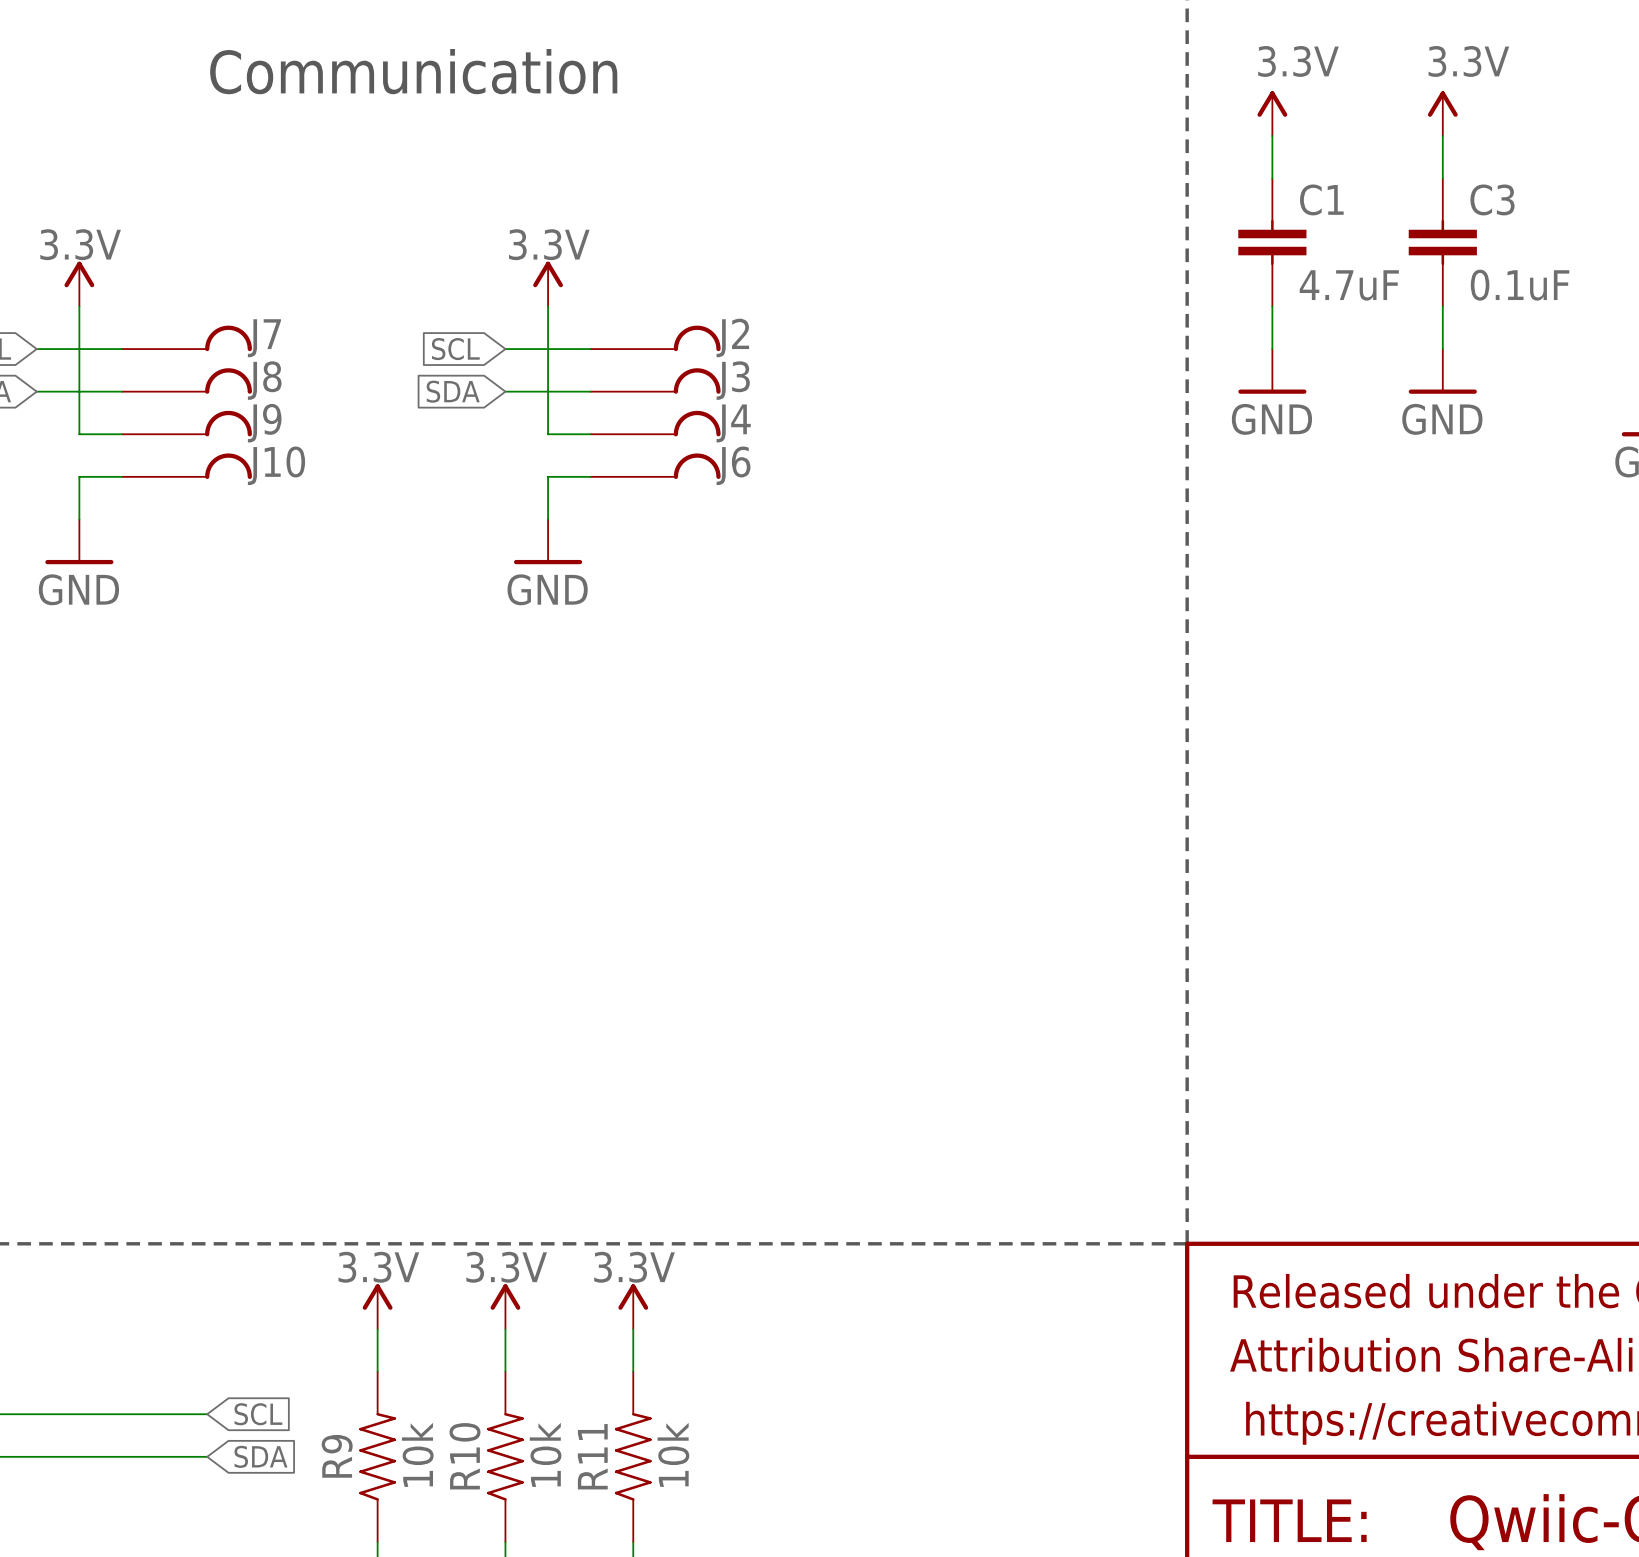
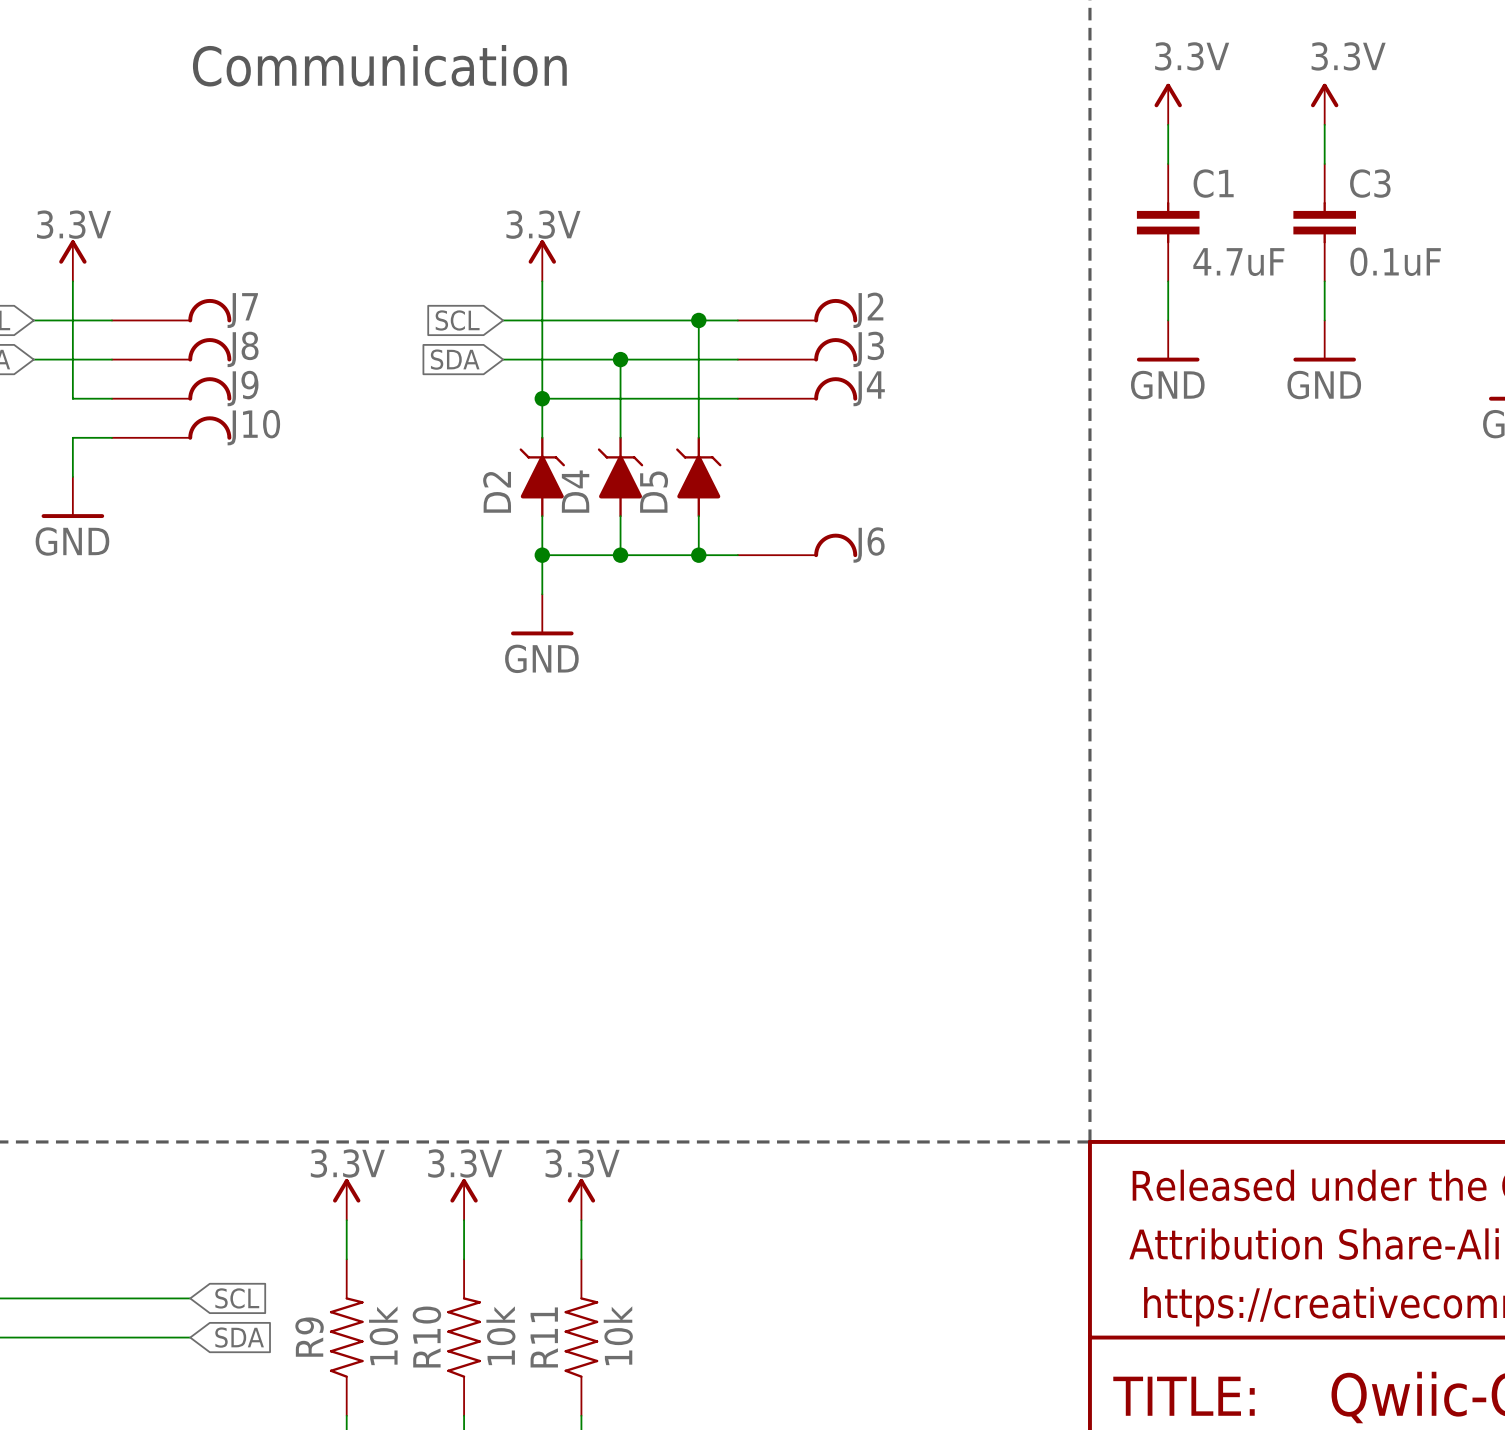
power symbol position: 3.3V (548, 284) -> 3.3V (542, 260)
wire: (548, 306) (548, 434) (590, 434) -> (737, 398) (542, 398)
J2 position: (655, 338) -> (797, 310)
global label position: SCL (455, 349) -> SCL (457, 320)
wire: (505, 349) (548, 349) -> none
wire: none -> (542, 320) (737, 320)
wire: none -> (698, 320) (698, 437)
junction: none -> (698, 320)
J3 position: (655, 381) -> (797, 349)
global label position: SDA (453, 391) -> SDA (455, 359)
wire: (505, 391) (548, 391) -> none
wire: none -> (542, 359) (737, 359)
wire: none -> (620, 359) (620, 437)
junction: none -> (620, 359)
J4 position: (655, 423) -> (797, 388)
junction: none -> (542, 398)
J6 position: (655, 466) -> (797, 545)
wire: (590, 476) (548, 476) (548, 519) -> (542, 437) (542, 281)
D2: none -> (542, 476)
D4: none -> (620, 476)
D5: none -> (698, 476)
power symbol position: GND (548, 541) -> GND (542, 614)
wire: none -> (542, 516) (542, 594)
wire: none -> (620, 516) (620, 555)
wire: none -> (698, 516) (698, 555)
wire: none -> (542, 555) (737, 555)
junction: none -> (542, 555)
junction: none -> (620, 555)
junction: none -> (698, 555)

